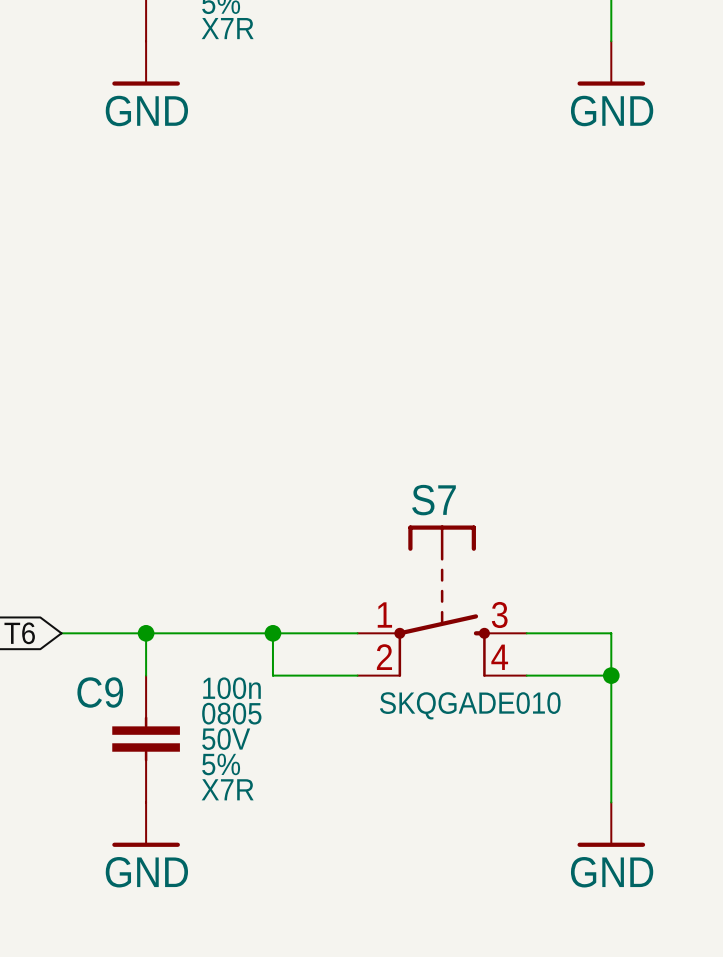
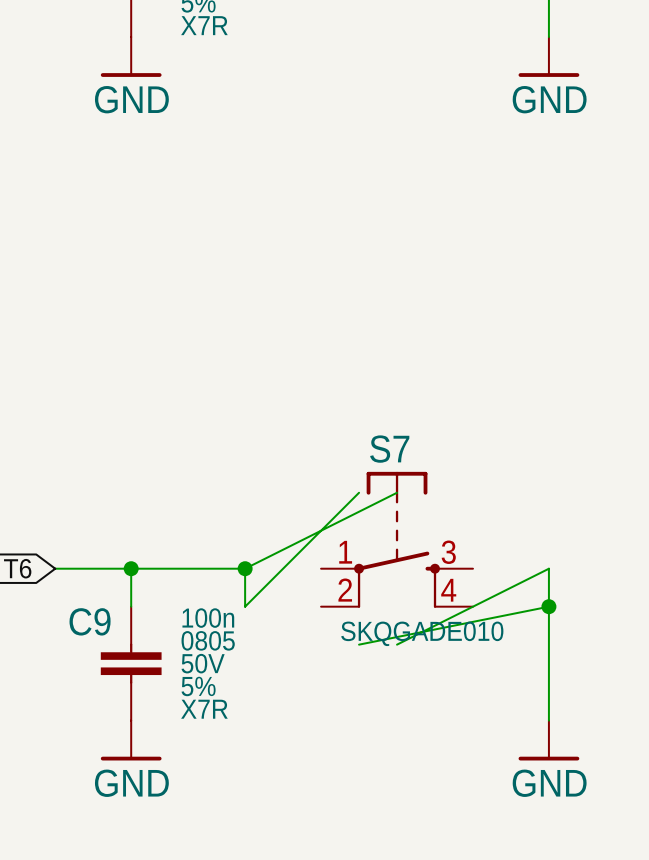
wire: (272, 633) (357, 633) -> (245, 568) (397, 492)
wire: (526, 633) (611, 633) -> (397, 644) (548, 568)
wire: (272, 675) (357, 675) -> (245, 606) (359, 492)
wire: (526, 675) (611, 675) -> (359, 644) (548, 606)

